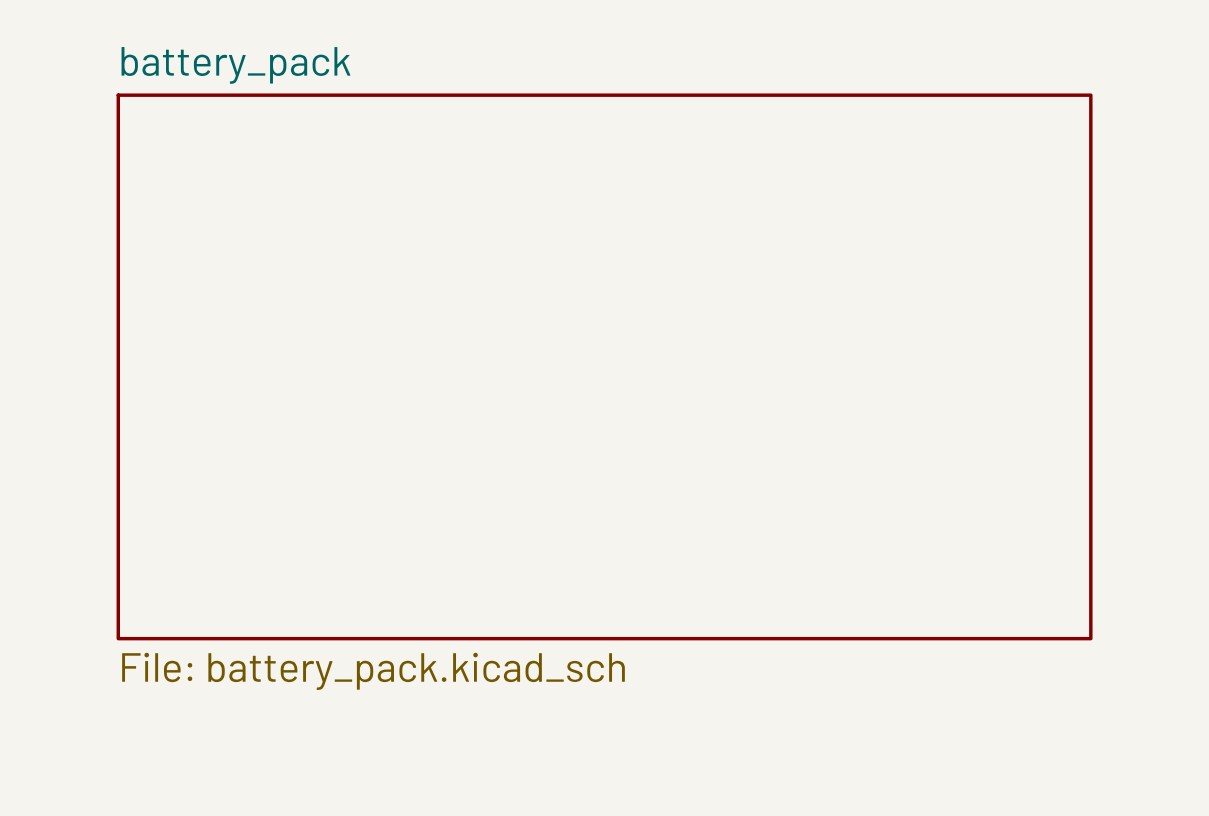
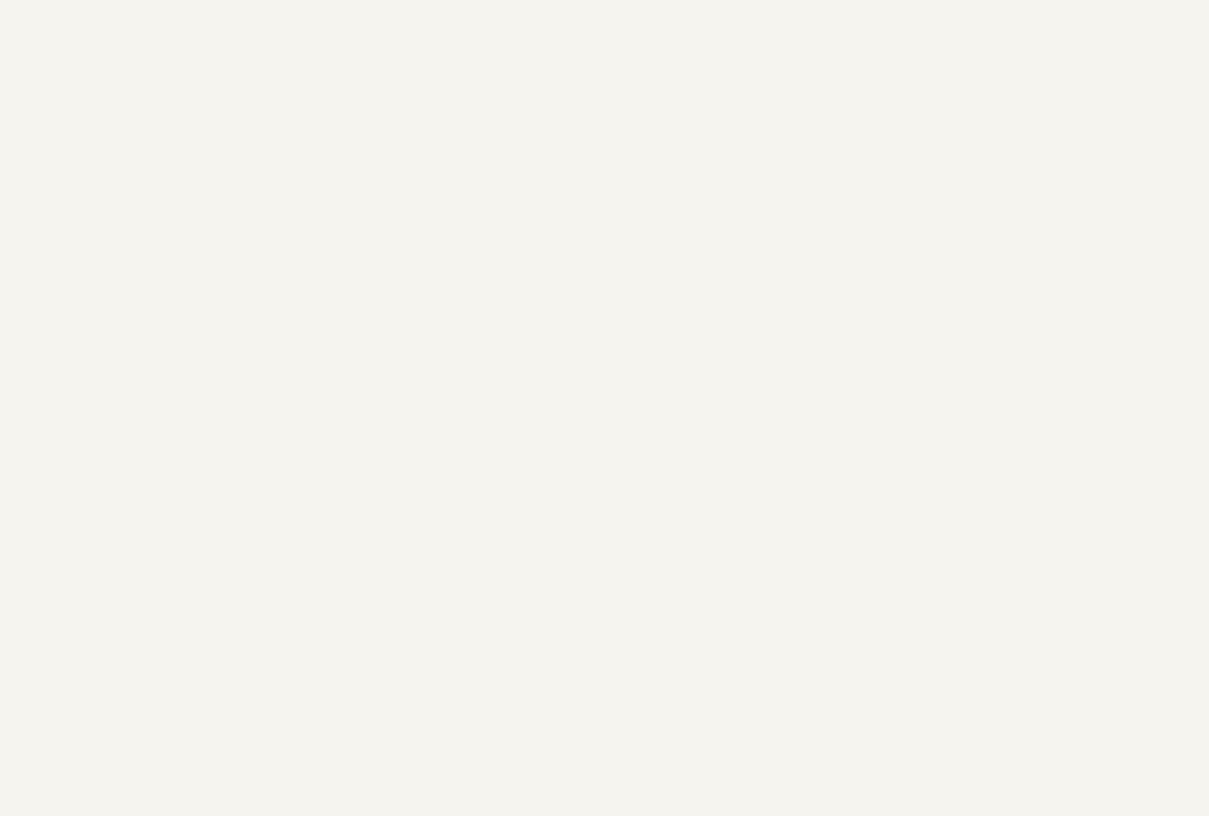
sheet battery_pack: File: battery_pack.kicad_sch (604, 366) -> none

